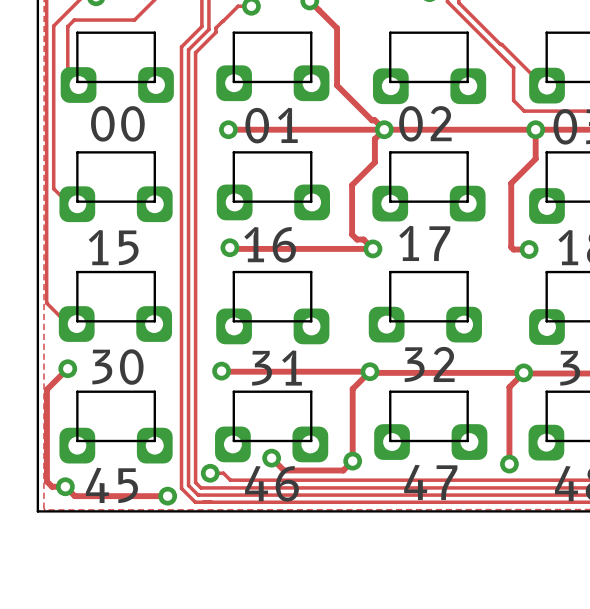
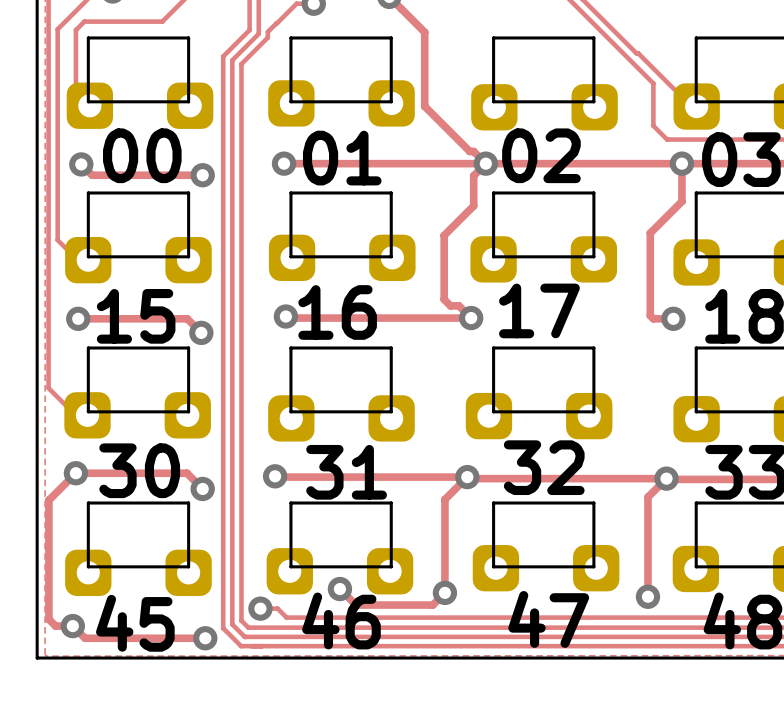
track: none -> (81, 164) (92, 175) (202, 175)
via: none -> (81, 164)
via: none -> (202, 175)
track: none -> (78, 318) (187, 318) (201, 332)
via: none -> (78, 318)
via: none -> (201, 332)
track: none -> (75, 473) (186, 473) (202, 488)
via: none -> (202, 488)

